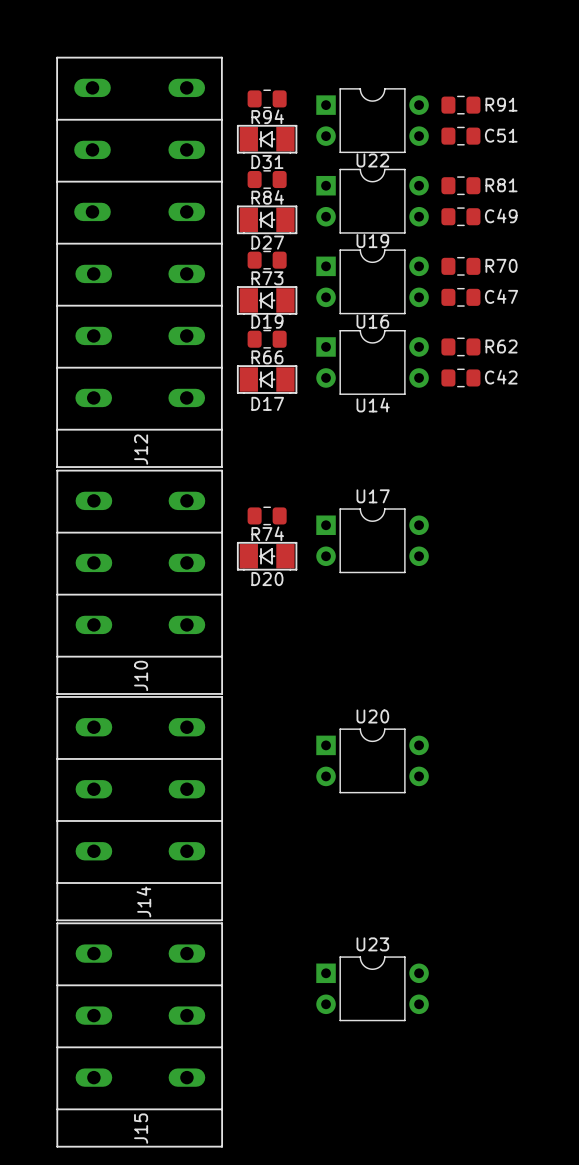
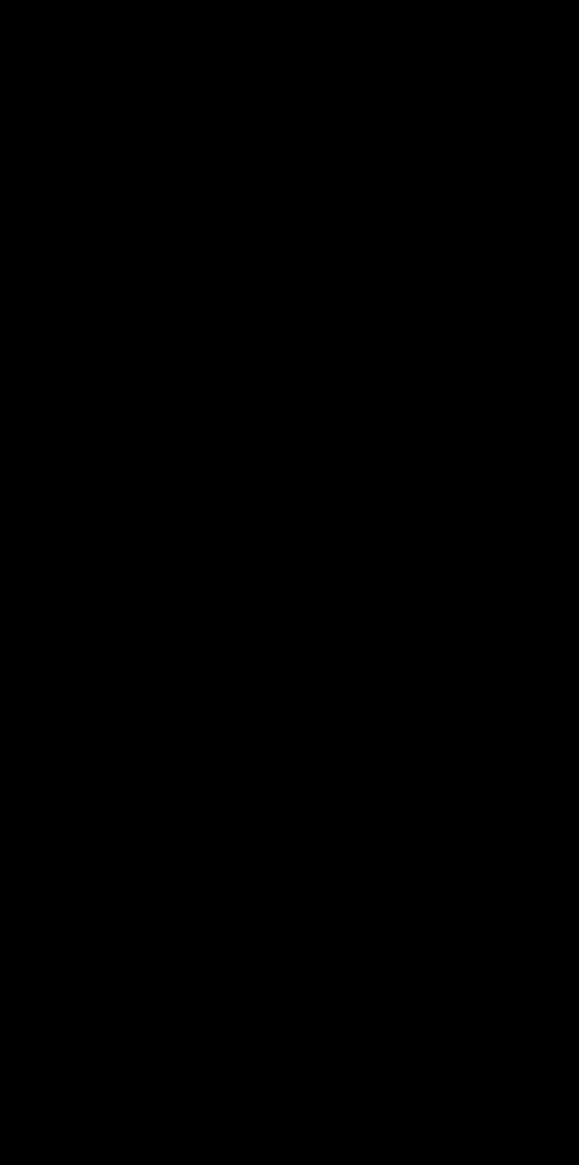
R94: (267, 98) -> none
R91: (460, 105) -> none
U22: (372, 120) -> none
C51: (460, 136) -> none
D31: (267, 139) -> none
R84: (267, 179) -> none
R81: (460, 185) -> none
U19: (372, 201) -> none
C49: (460, 216) -> none
D27: (267, 219) -> none
R73: (267, 260) -> none
J12: (139, 262) -> none
R70: (460, 266) -> none
U16: (372, 281) -> none
C47: (460, 297) -> none
D19: (267, 300) -> none
R66: (267, 339) -> none
R62: (460, 346) -> none
U14: (372, 362) -> none
C42: (460, 377) -> none
D17: (267, 379) -> none
R74: (267, 515) -> none
U17: (372, 540) -> none
D20: (267, 556) -> none
J10: (139, 582) -> none
U20: (372, 760) -> none
J14: (139, 808) -> none
U23: (372, 988) -> none
J15: (139, 1035) -> none

